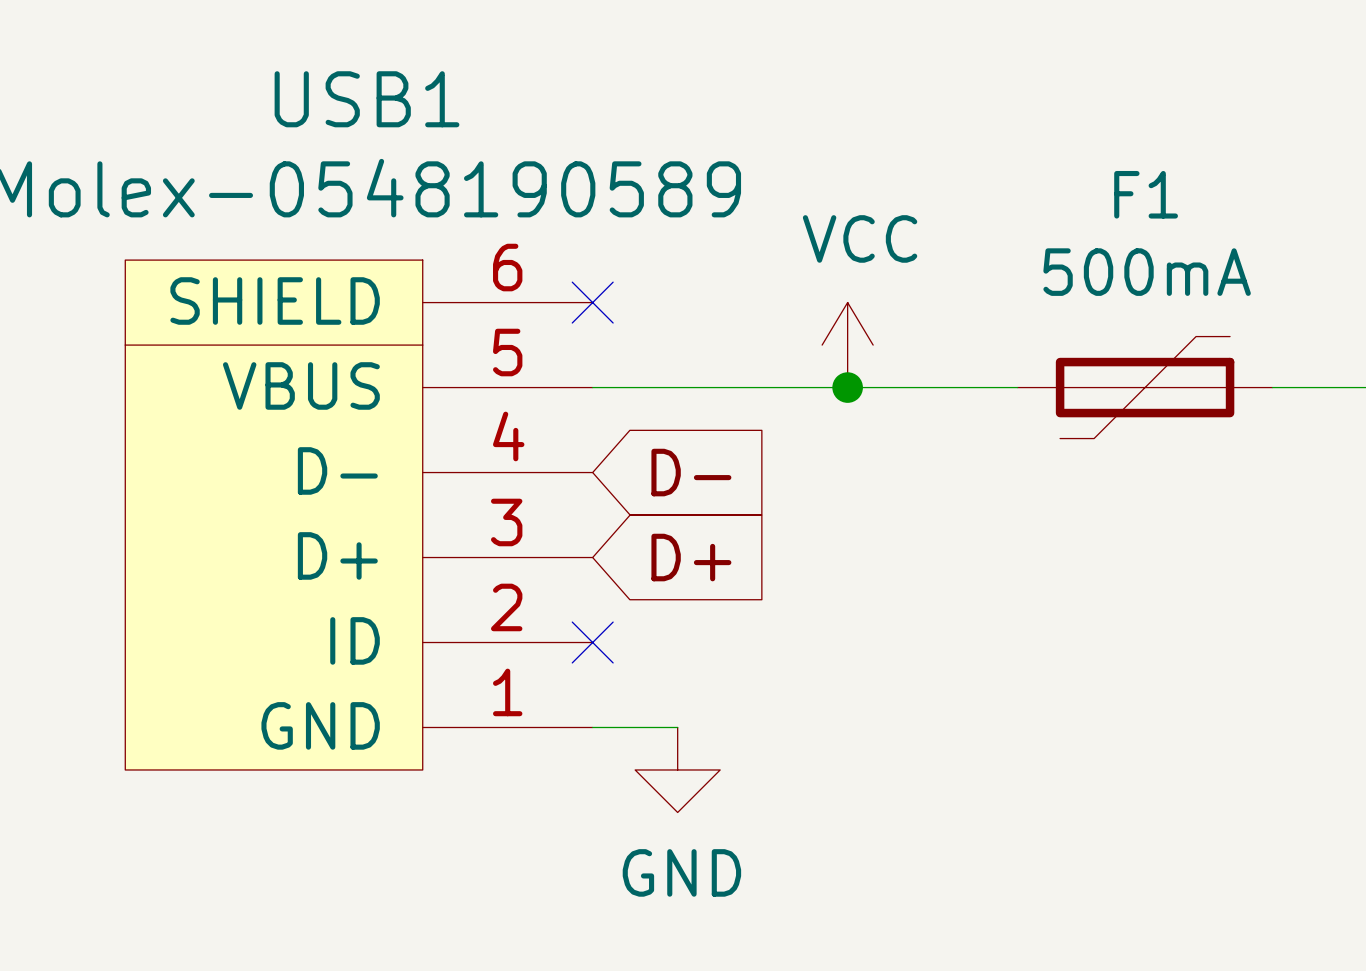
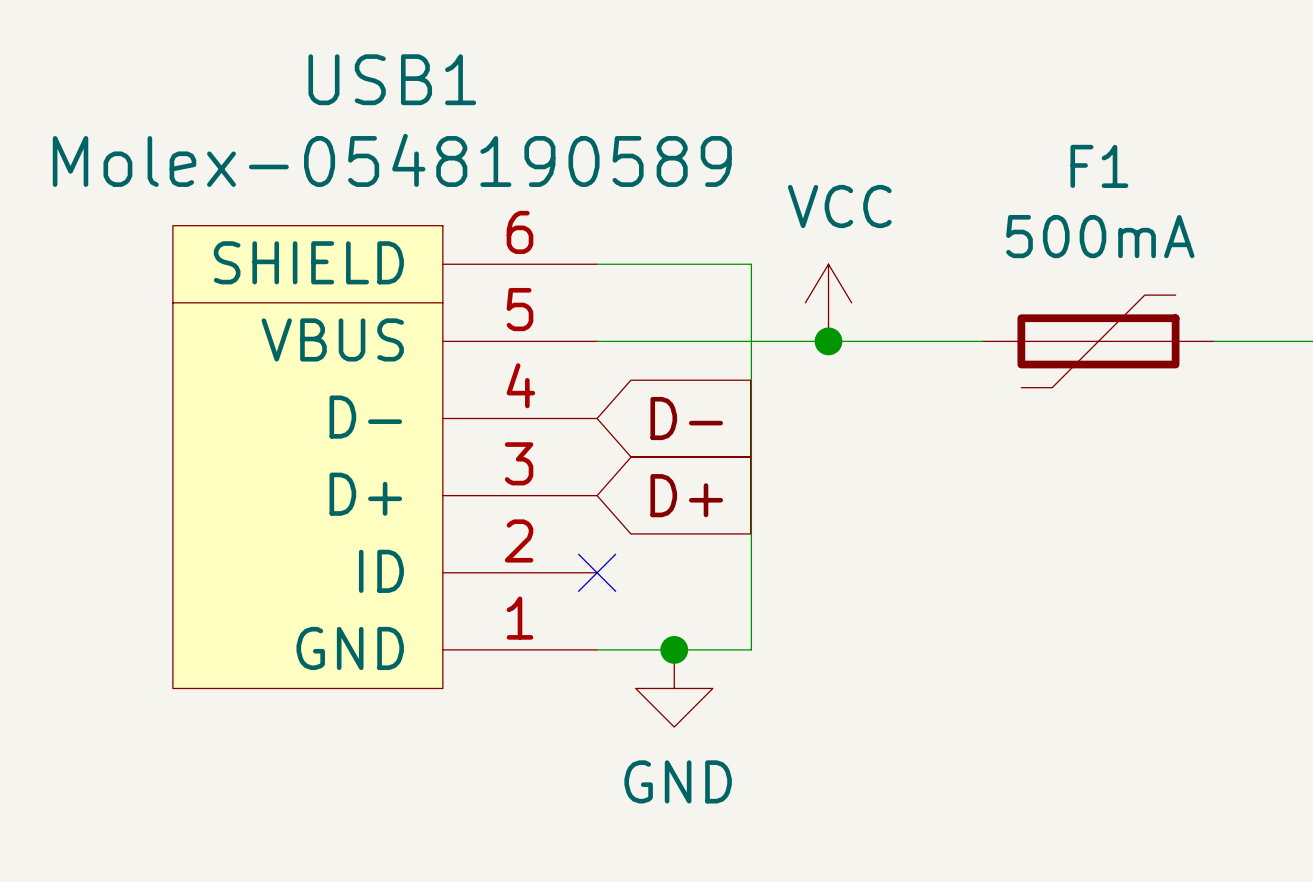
wire: none -> (597, 264) (751, 264) (751, 649) (674, 649)
no-connect mark: (592, 302) -> none
junction: none -> (674, 649)

